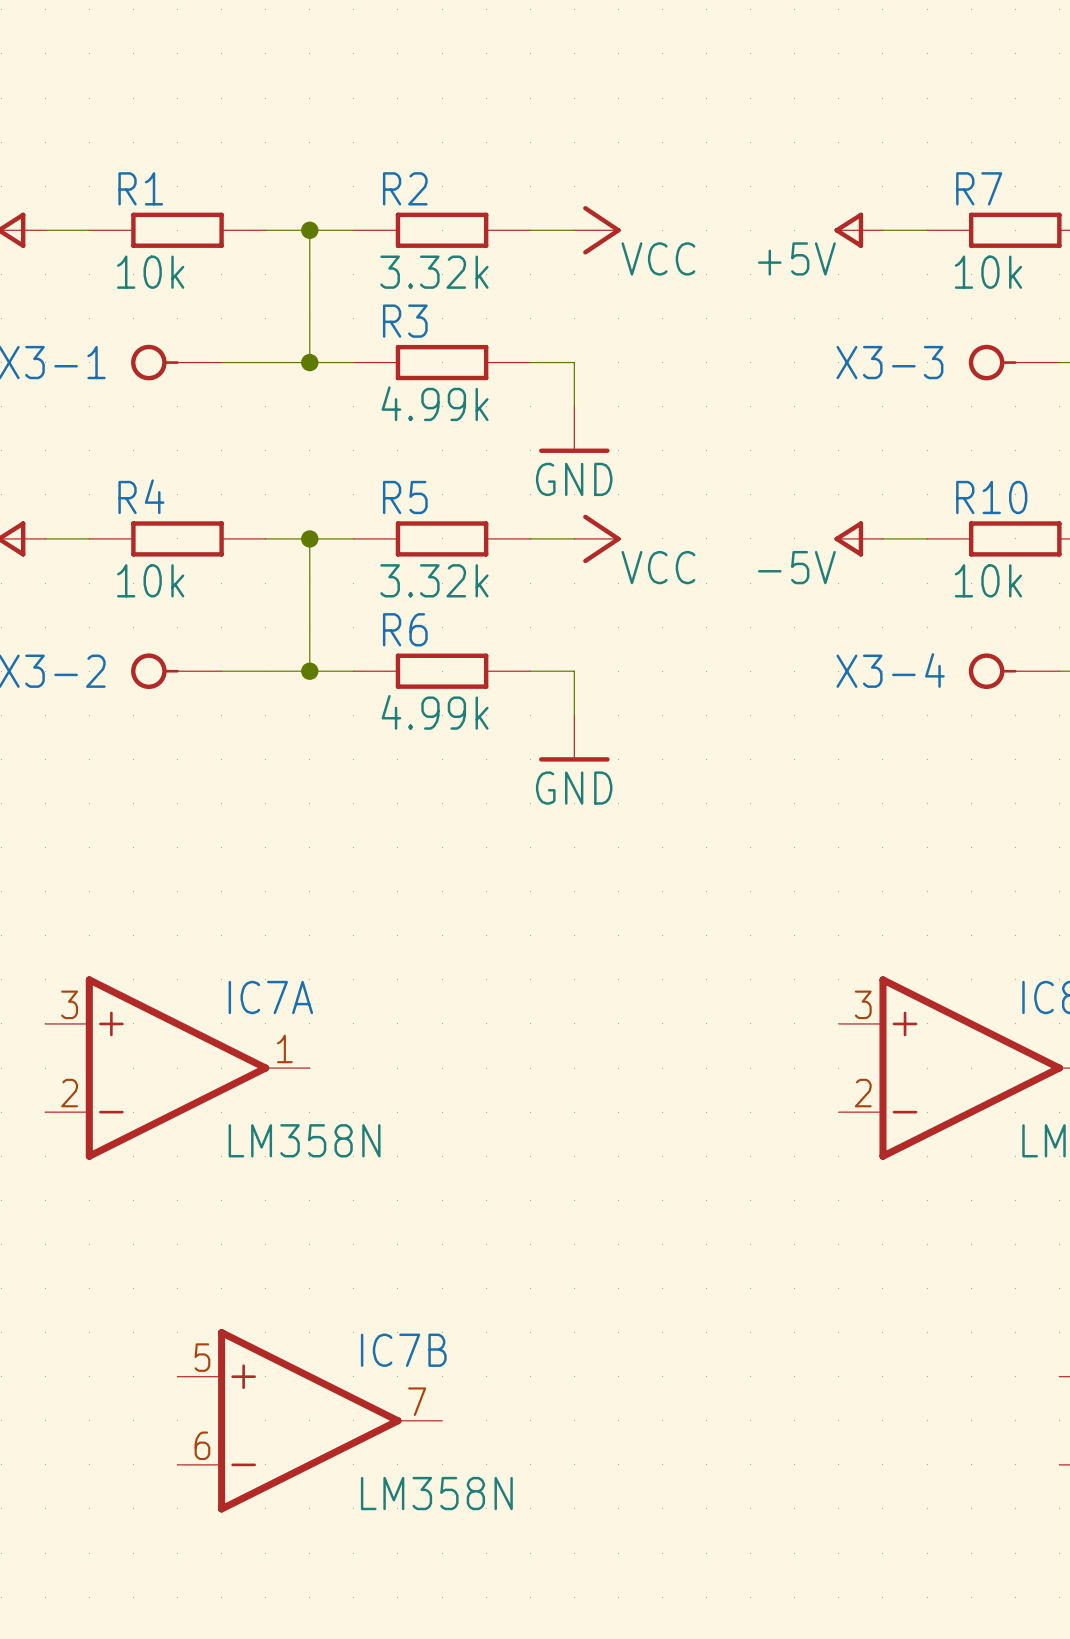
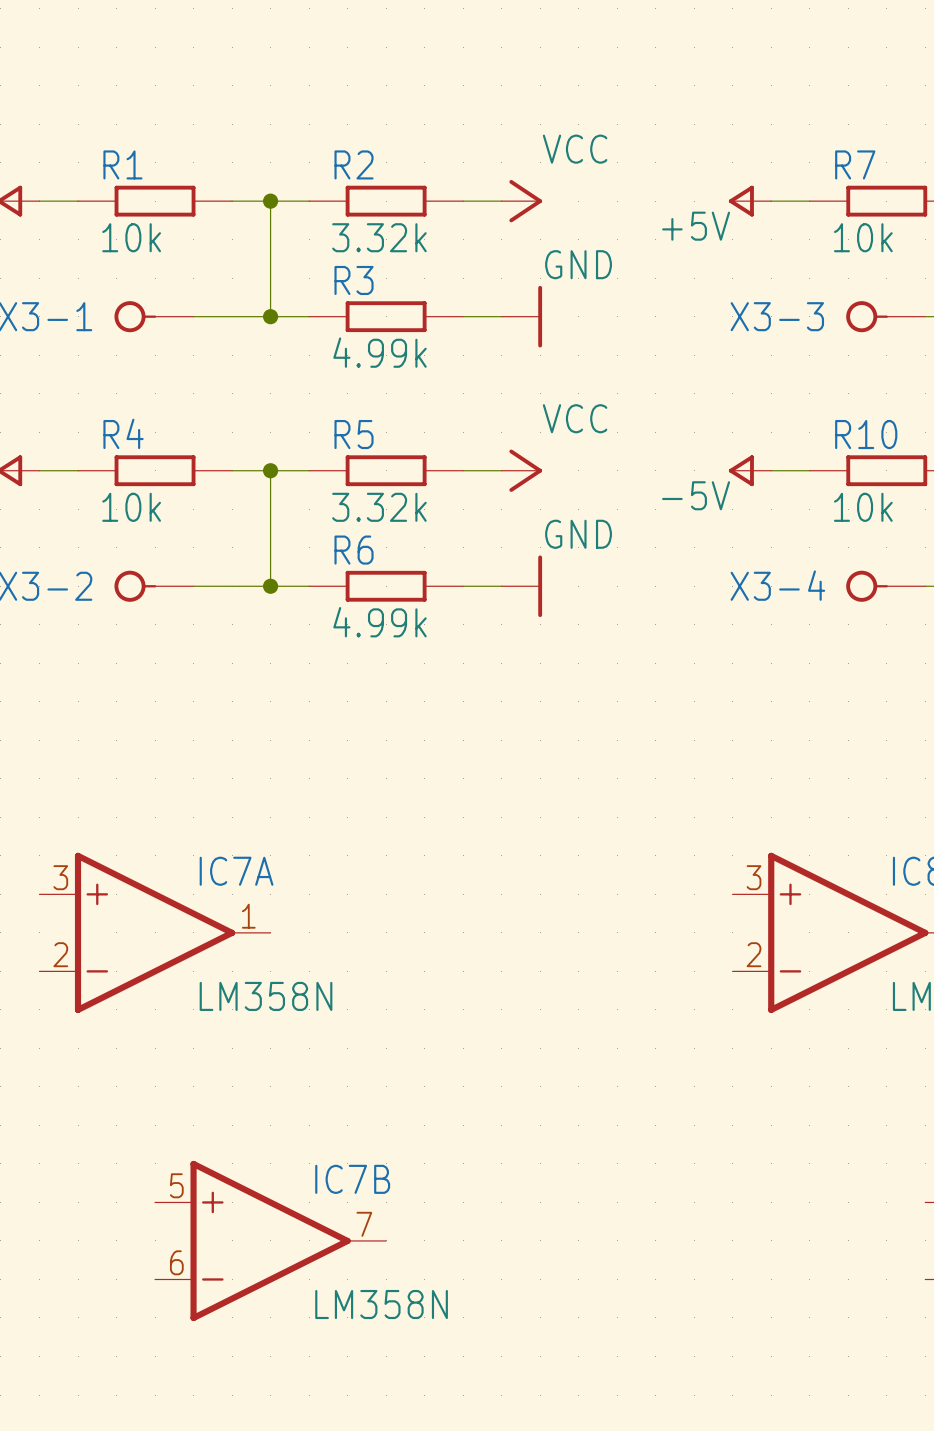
power symbol text position: VCC (658, 258) -> VCC (575, 149)
wire: (574, 362) (574, 406) -> none
power symbol position: GND (574, 429) -> GND (521, 316)
power symbol rotation: 0° (574, 450) -> 90° counterclockwise (540, 316)
power symbol text position: GND (574, 479) -> GND (578, 264)
power symbol text position: VCC (658, 567) -> VCC (575, 418)
wire: (574, 671) (574, 715) -> none
power symbol position: GND (574, 738) -> GND (521, 586)
power symbol rotation: 0° (574, 759) -> 90° counterclockwise (540, 586)
power symbol text position: GND (574, 788) -> GND (578, 534)

